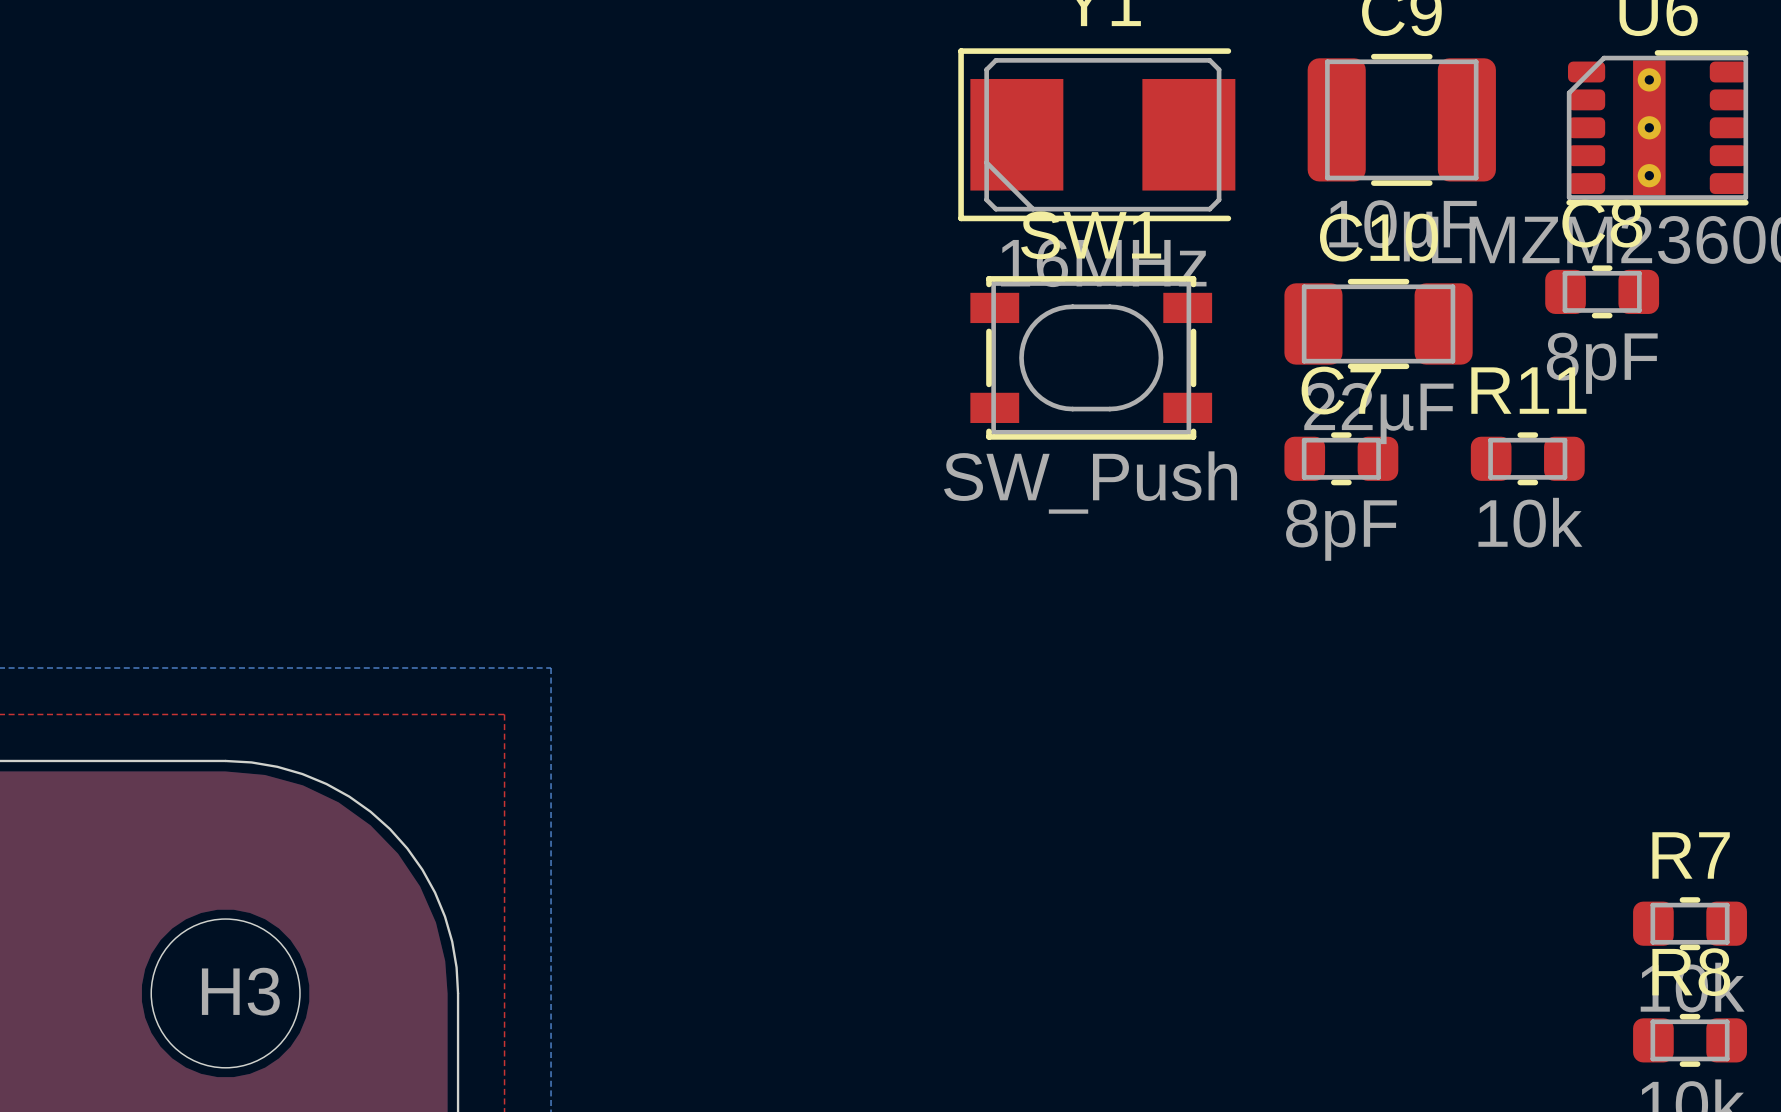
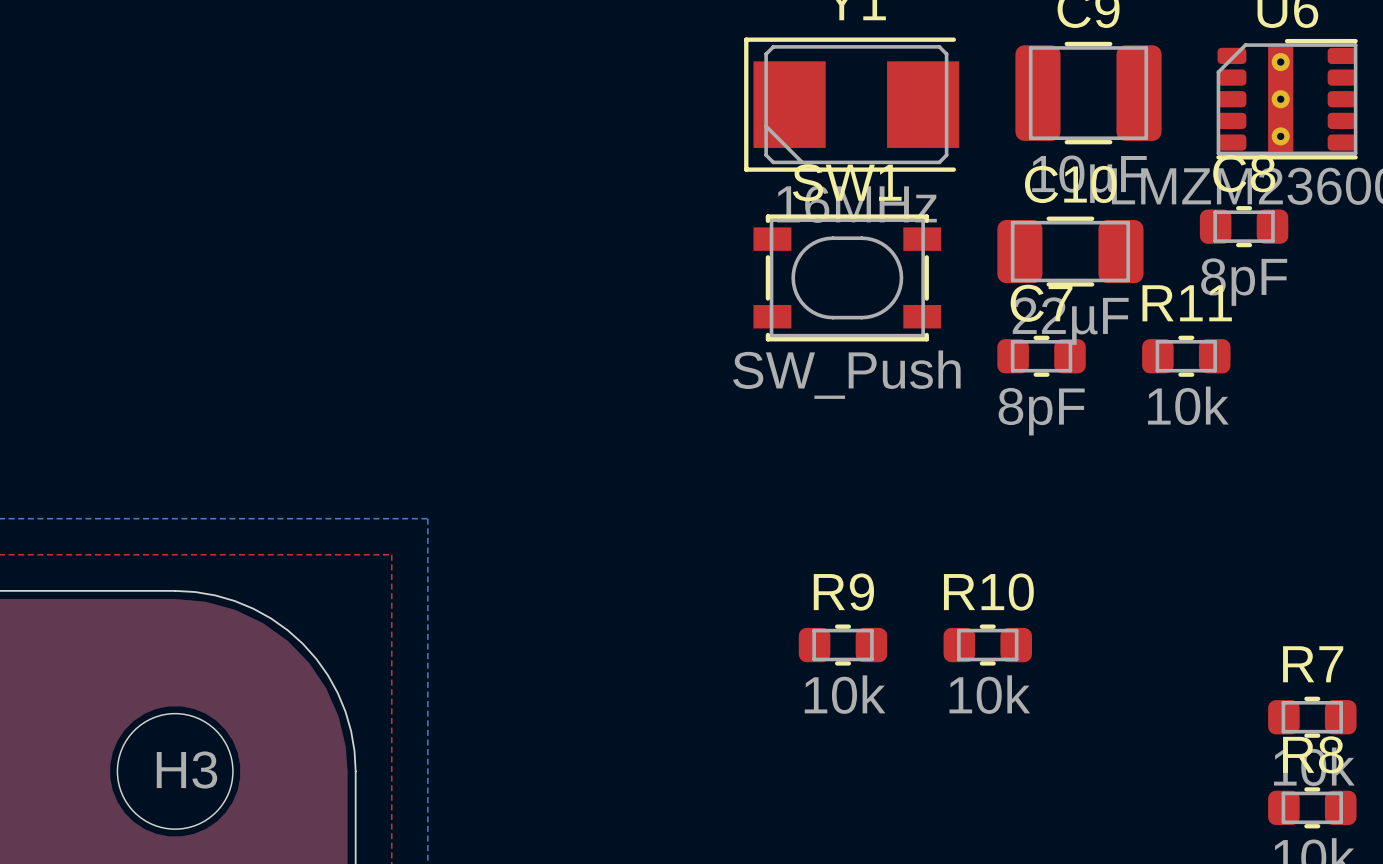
R9: none -> 10k (843, 645)
R10: none -> 10k (987, 645)

